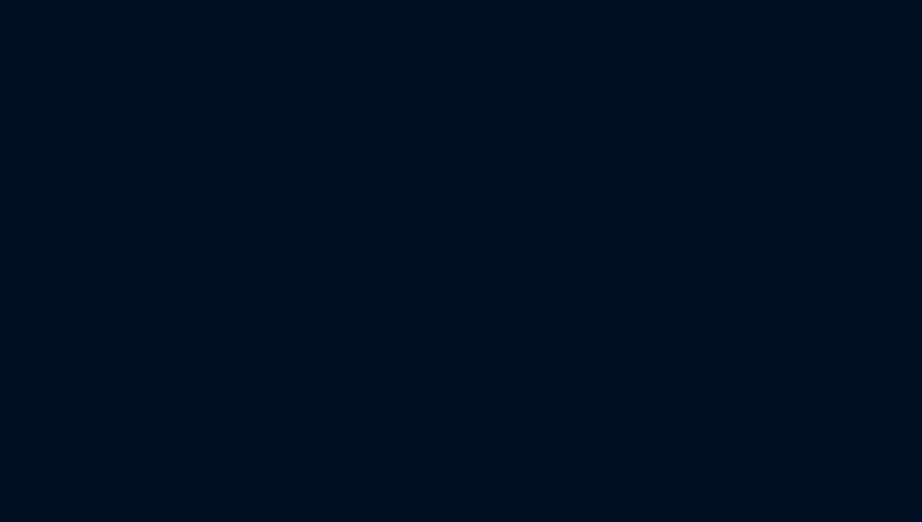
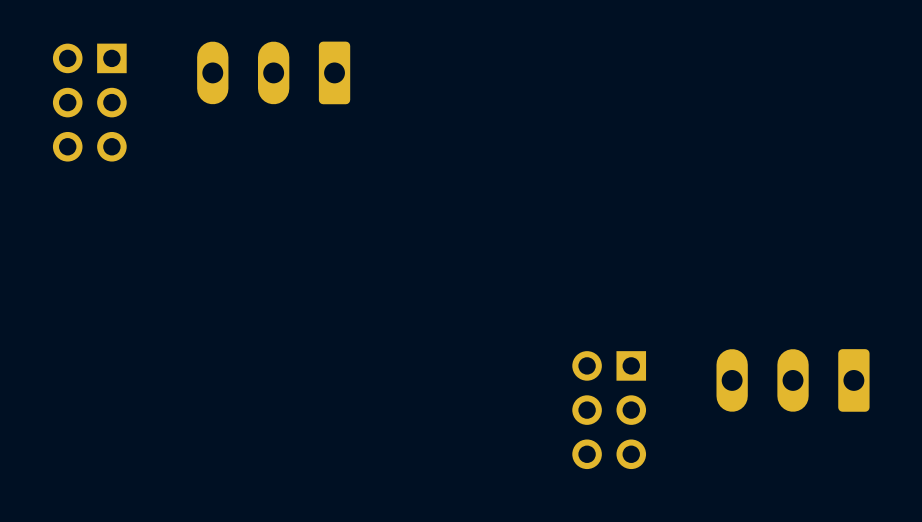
part: none -> (273, 72)
part: none -> (89, 102)
part: none -> (793, 380)
part: none -> (609, 410)

